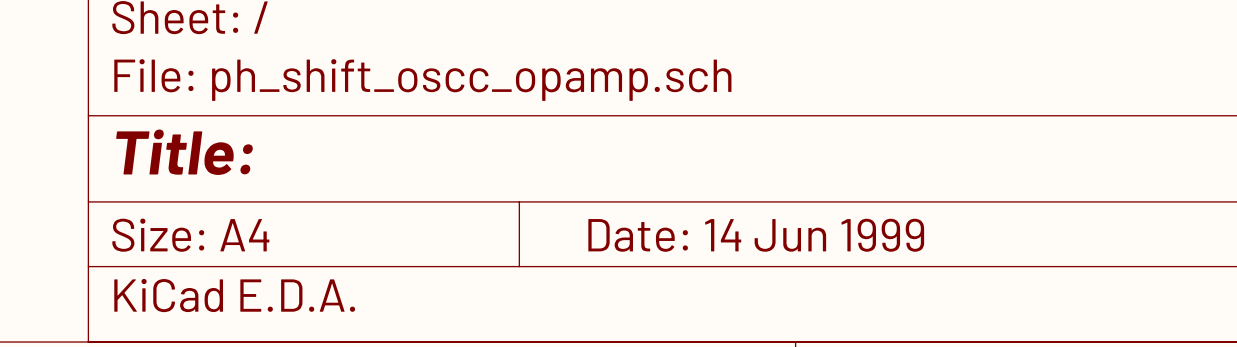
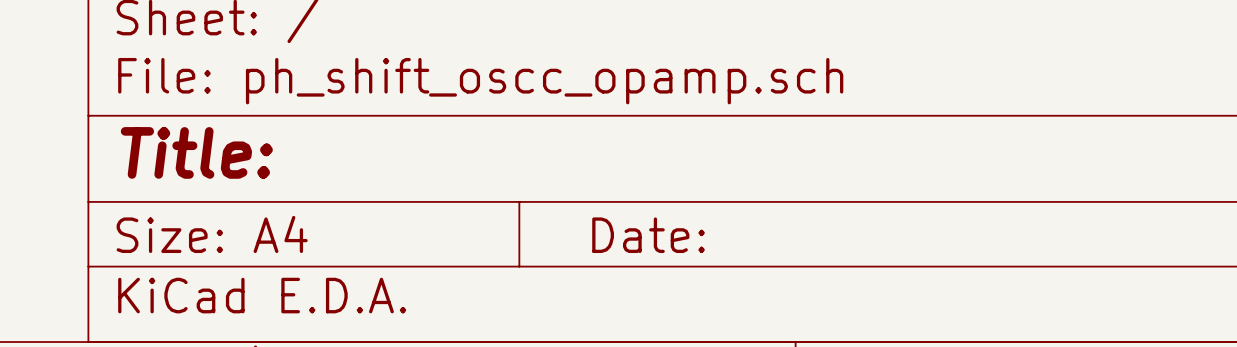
title block: Date: 14 Jun 1999 (756, 235) -> Date: (648, 235)

